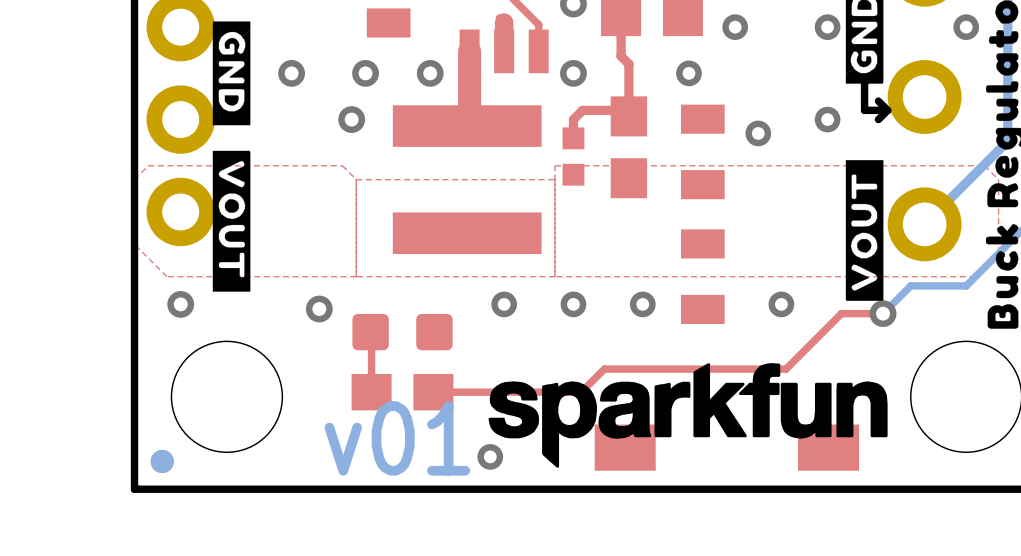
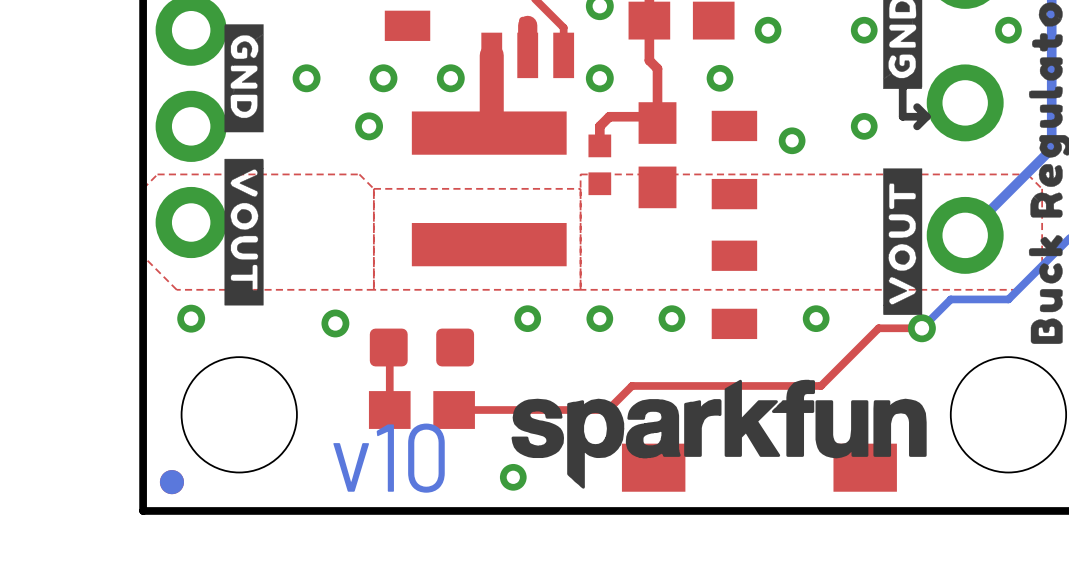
text: v01 (397, 438) -> v10 (389, 458)

